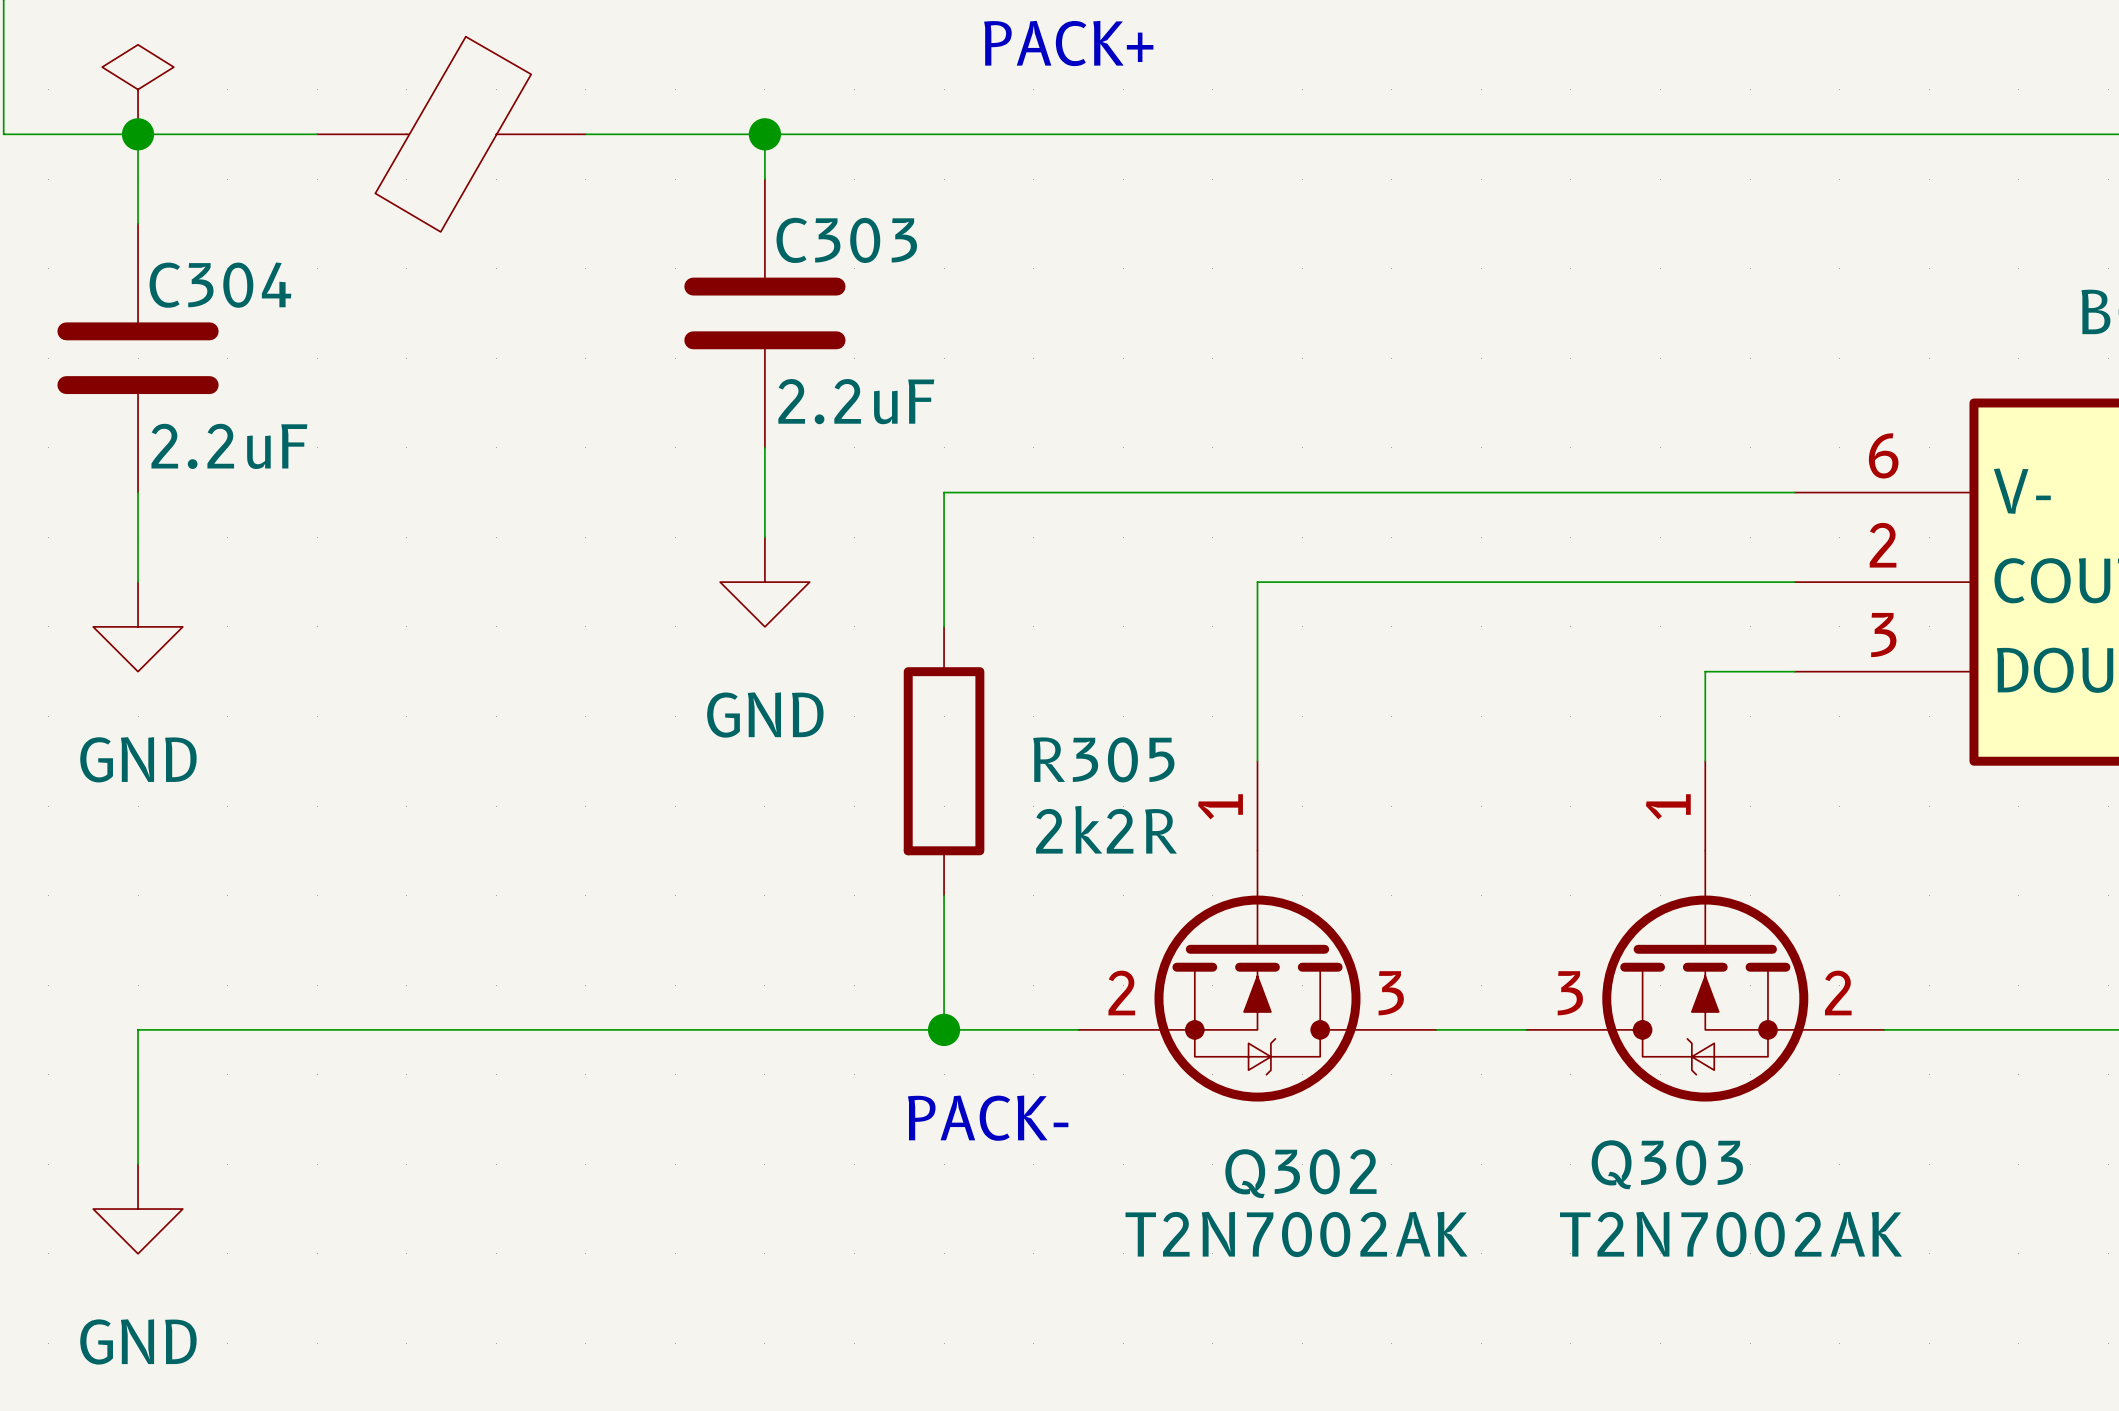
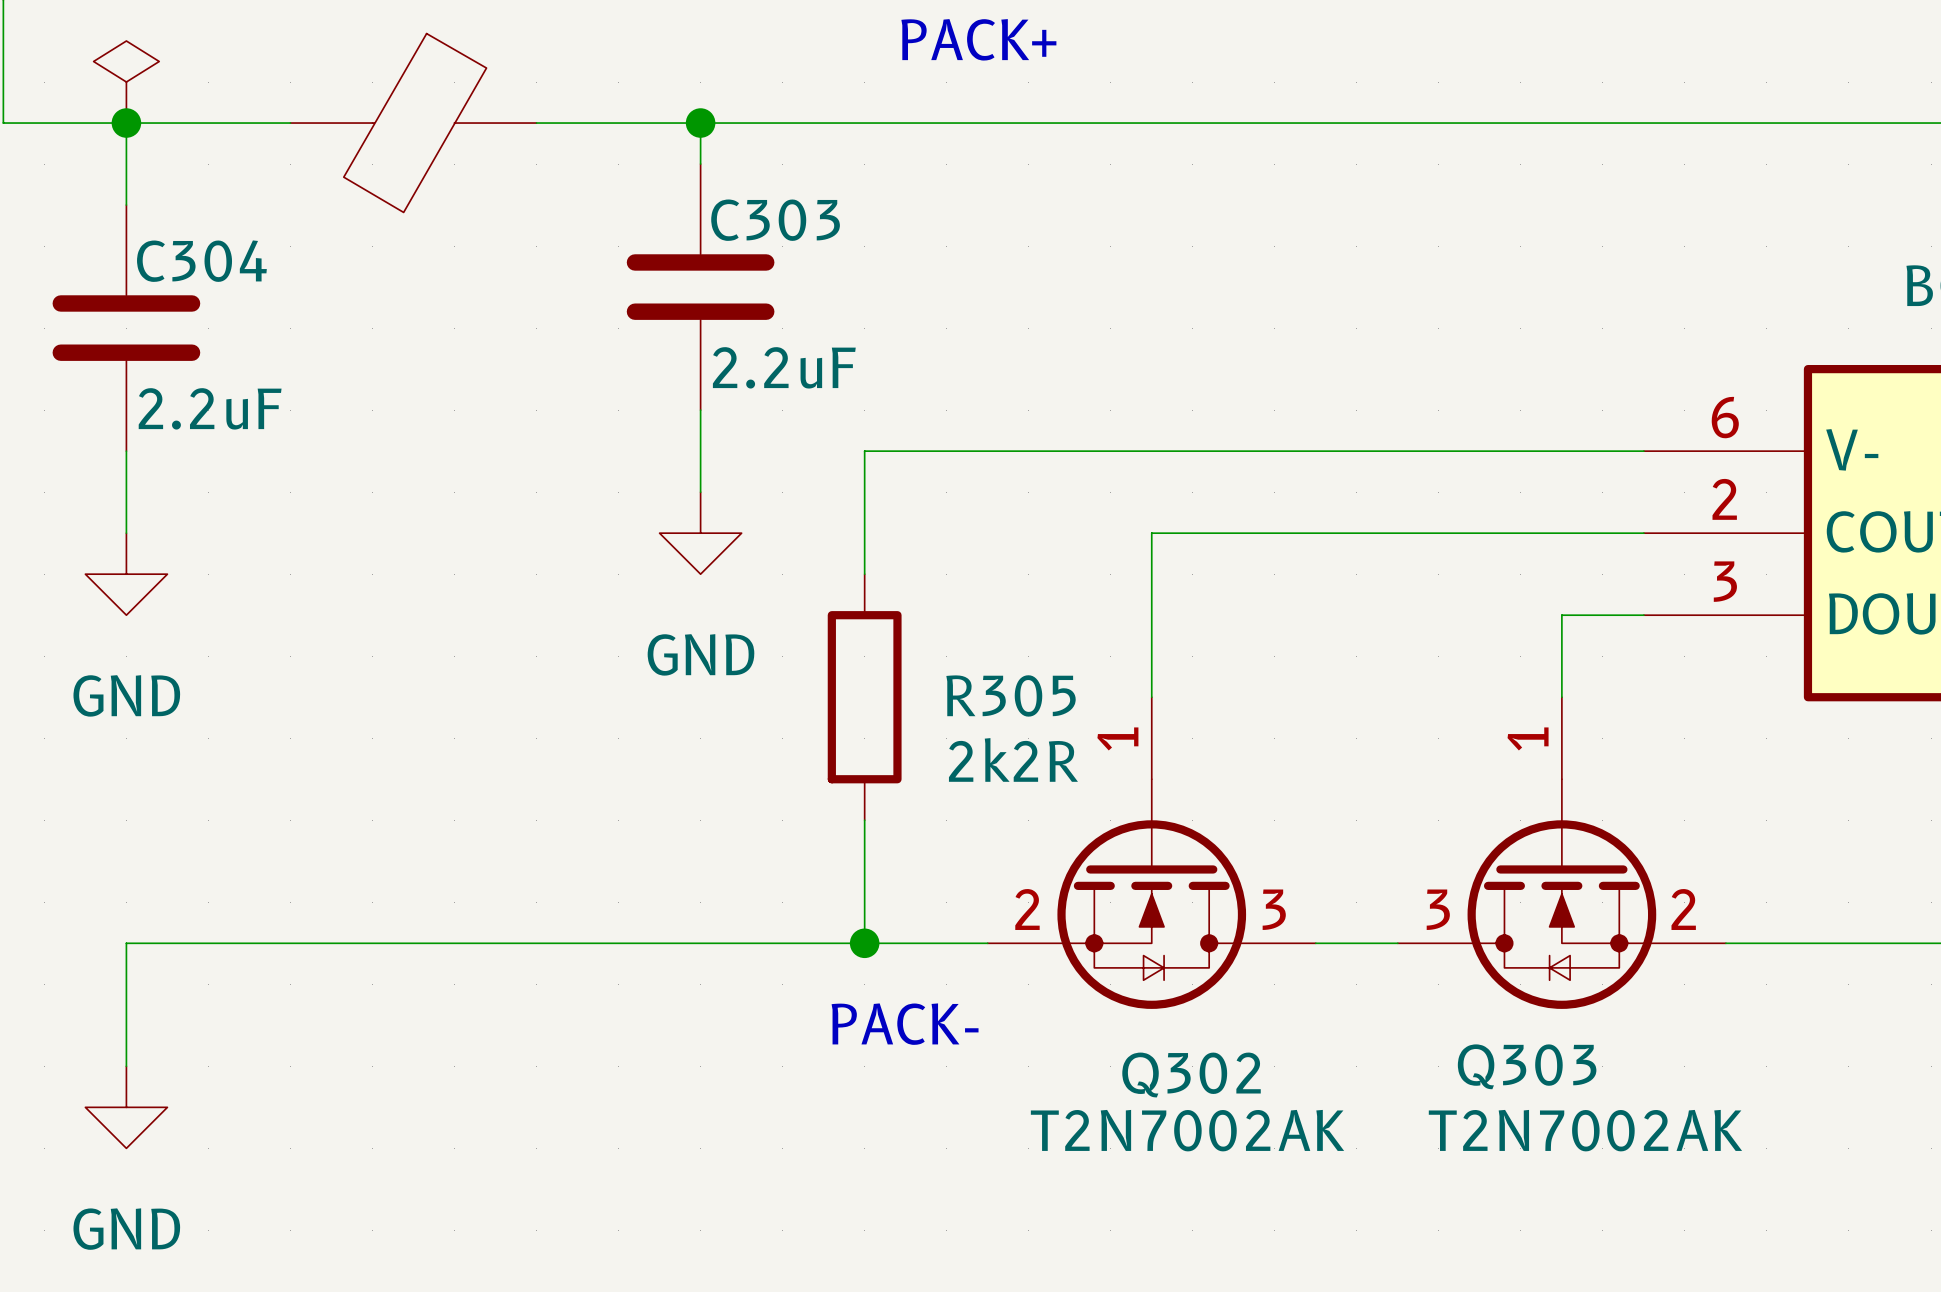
Q302 symbol: [1078, 761, 1437, 1102] -> [987, 697, 1316, 1009]
Q303 symbol: [1526, 761, 1885, 1102] -> [1397, 697, 1726, 1009]

